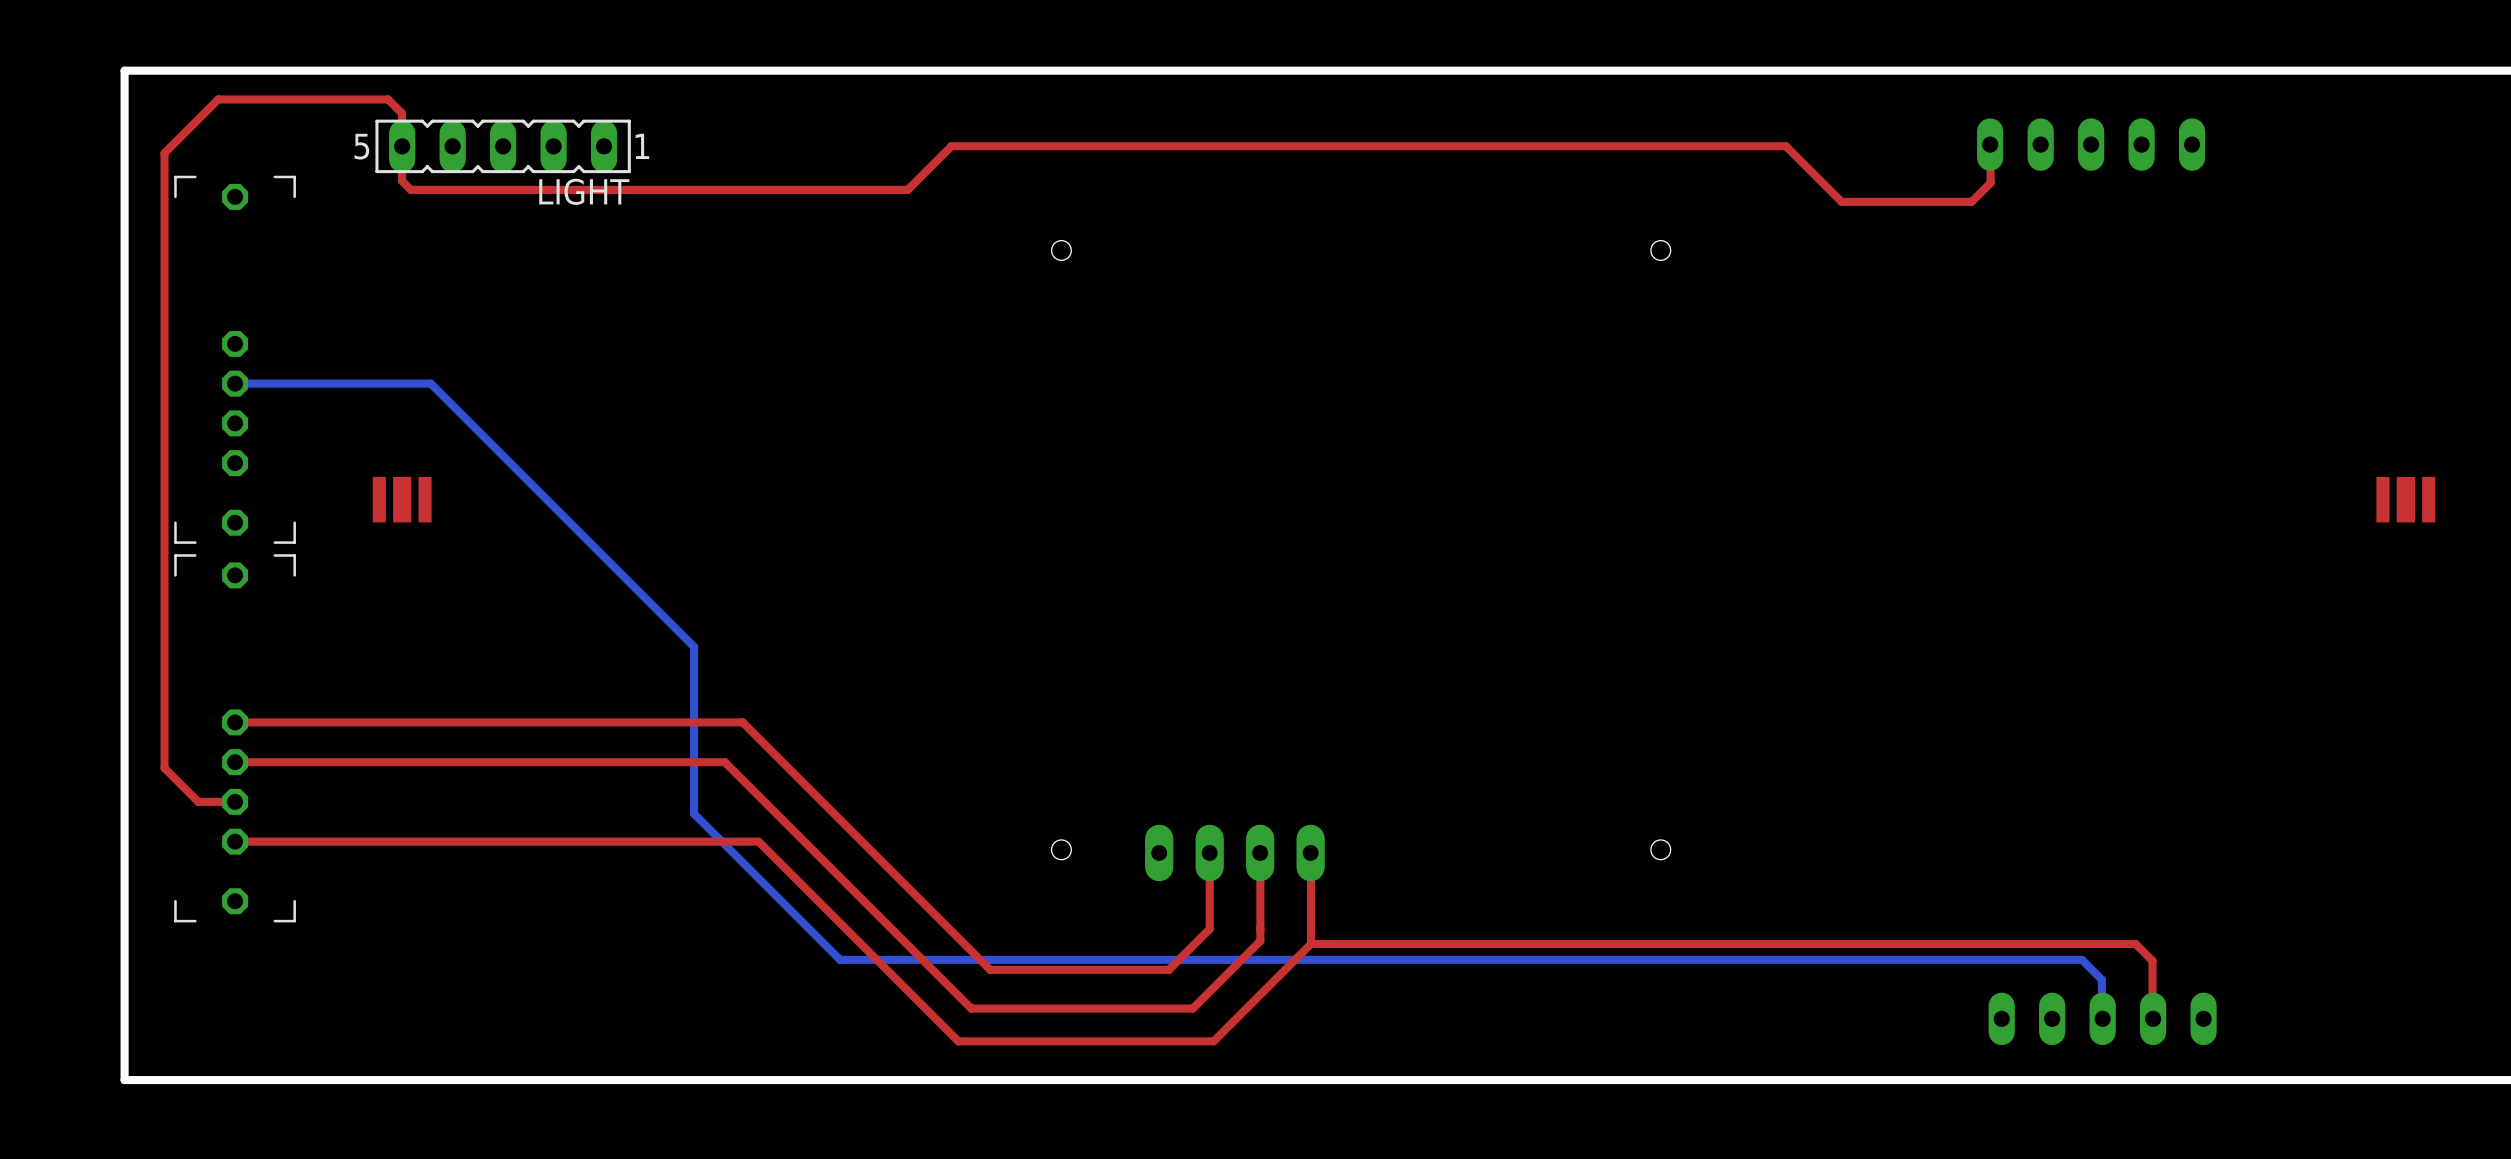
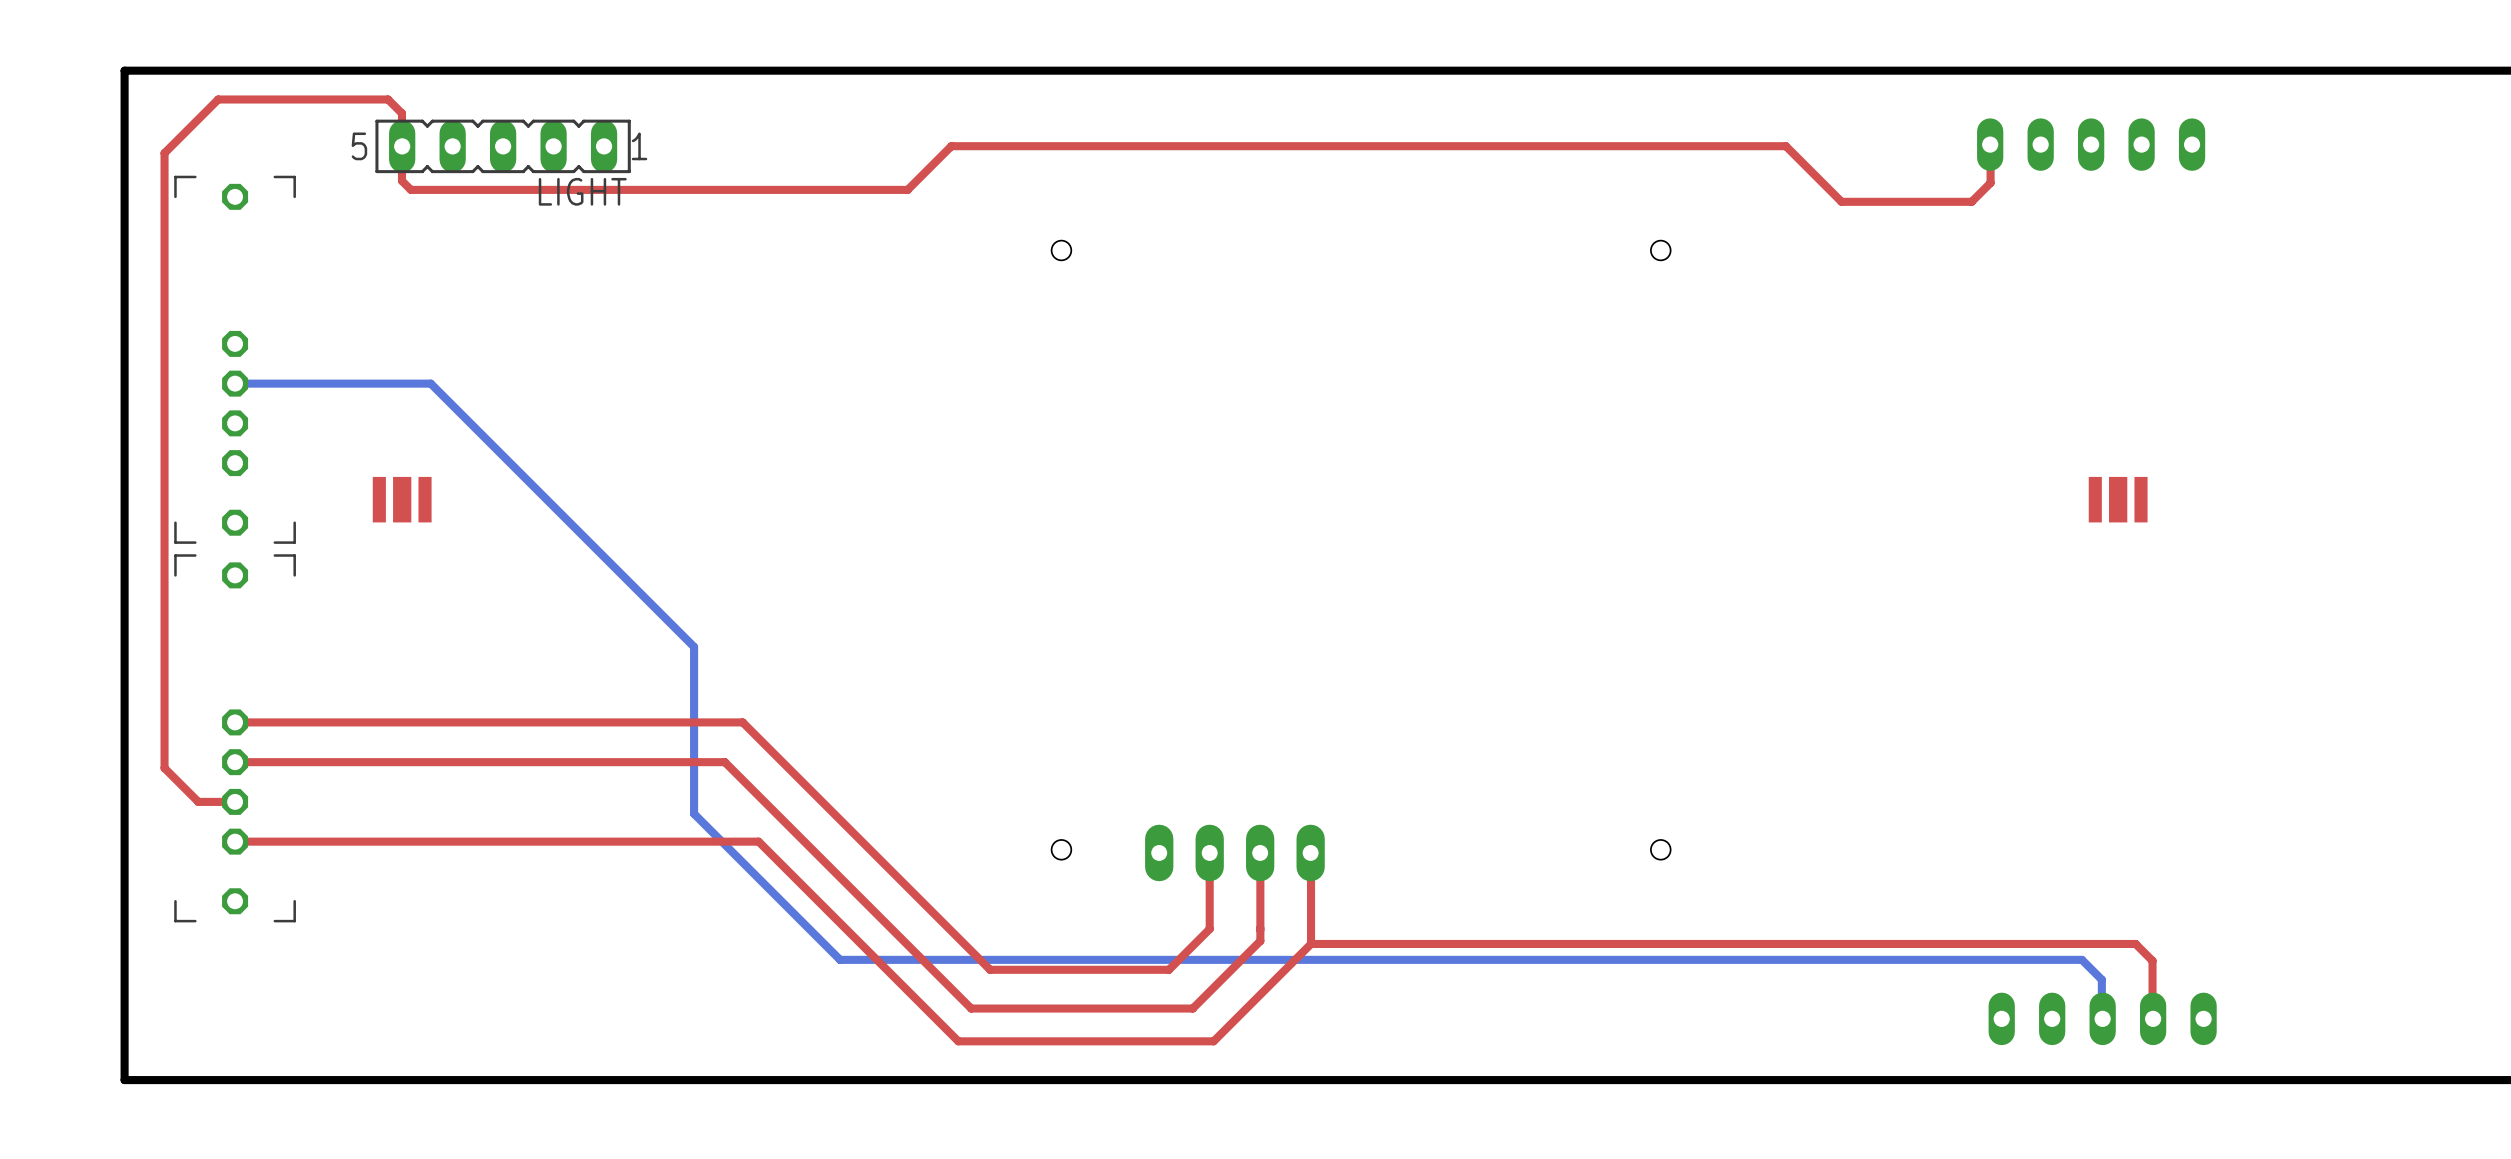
part position: (2405, 499) -> (2118, 499)

